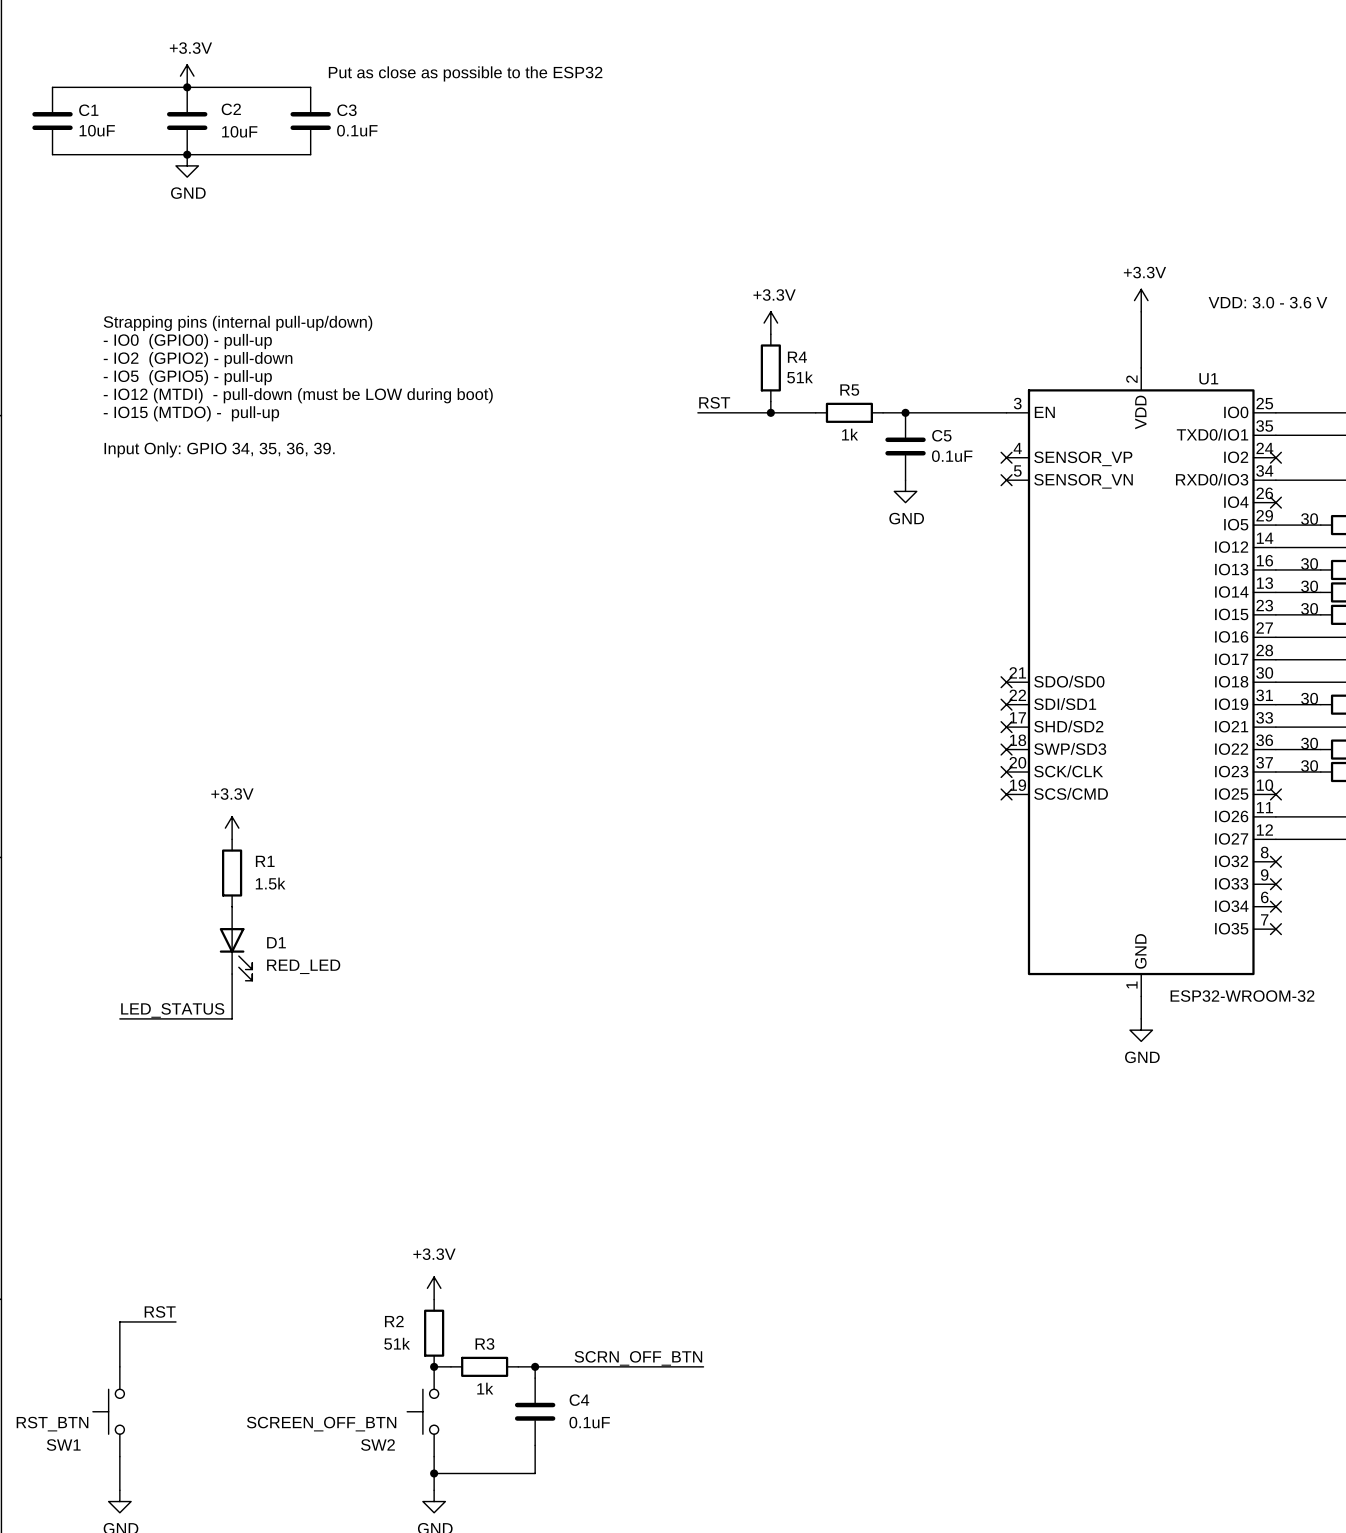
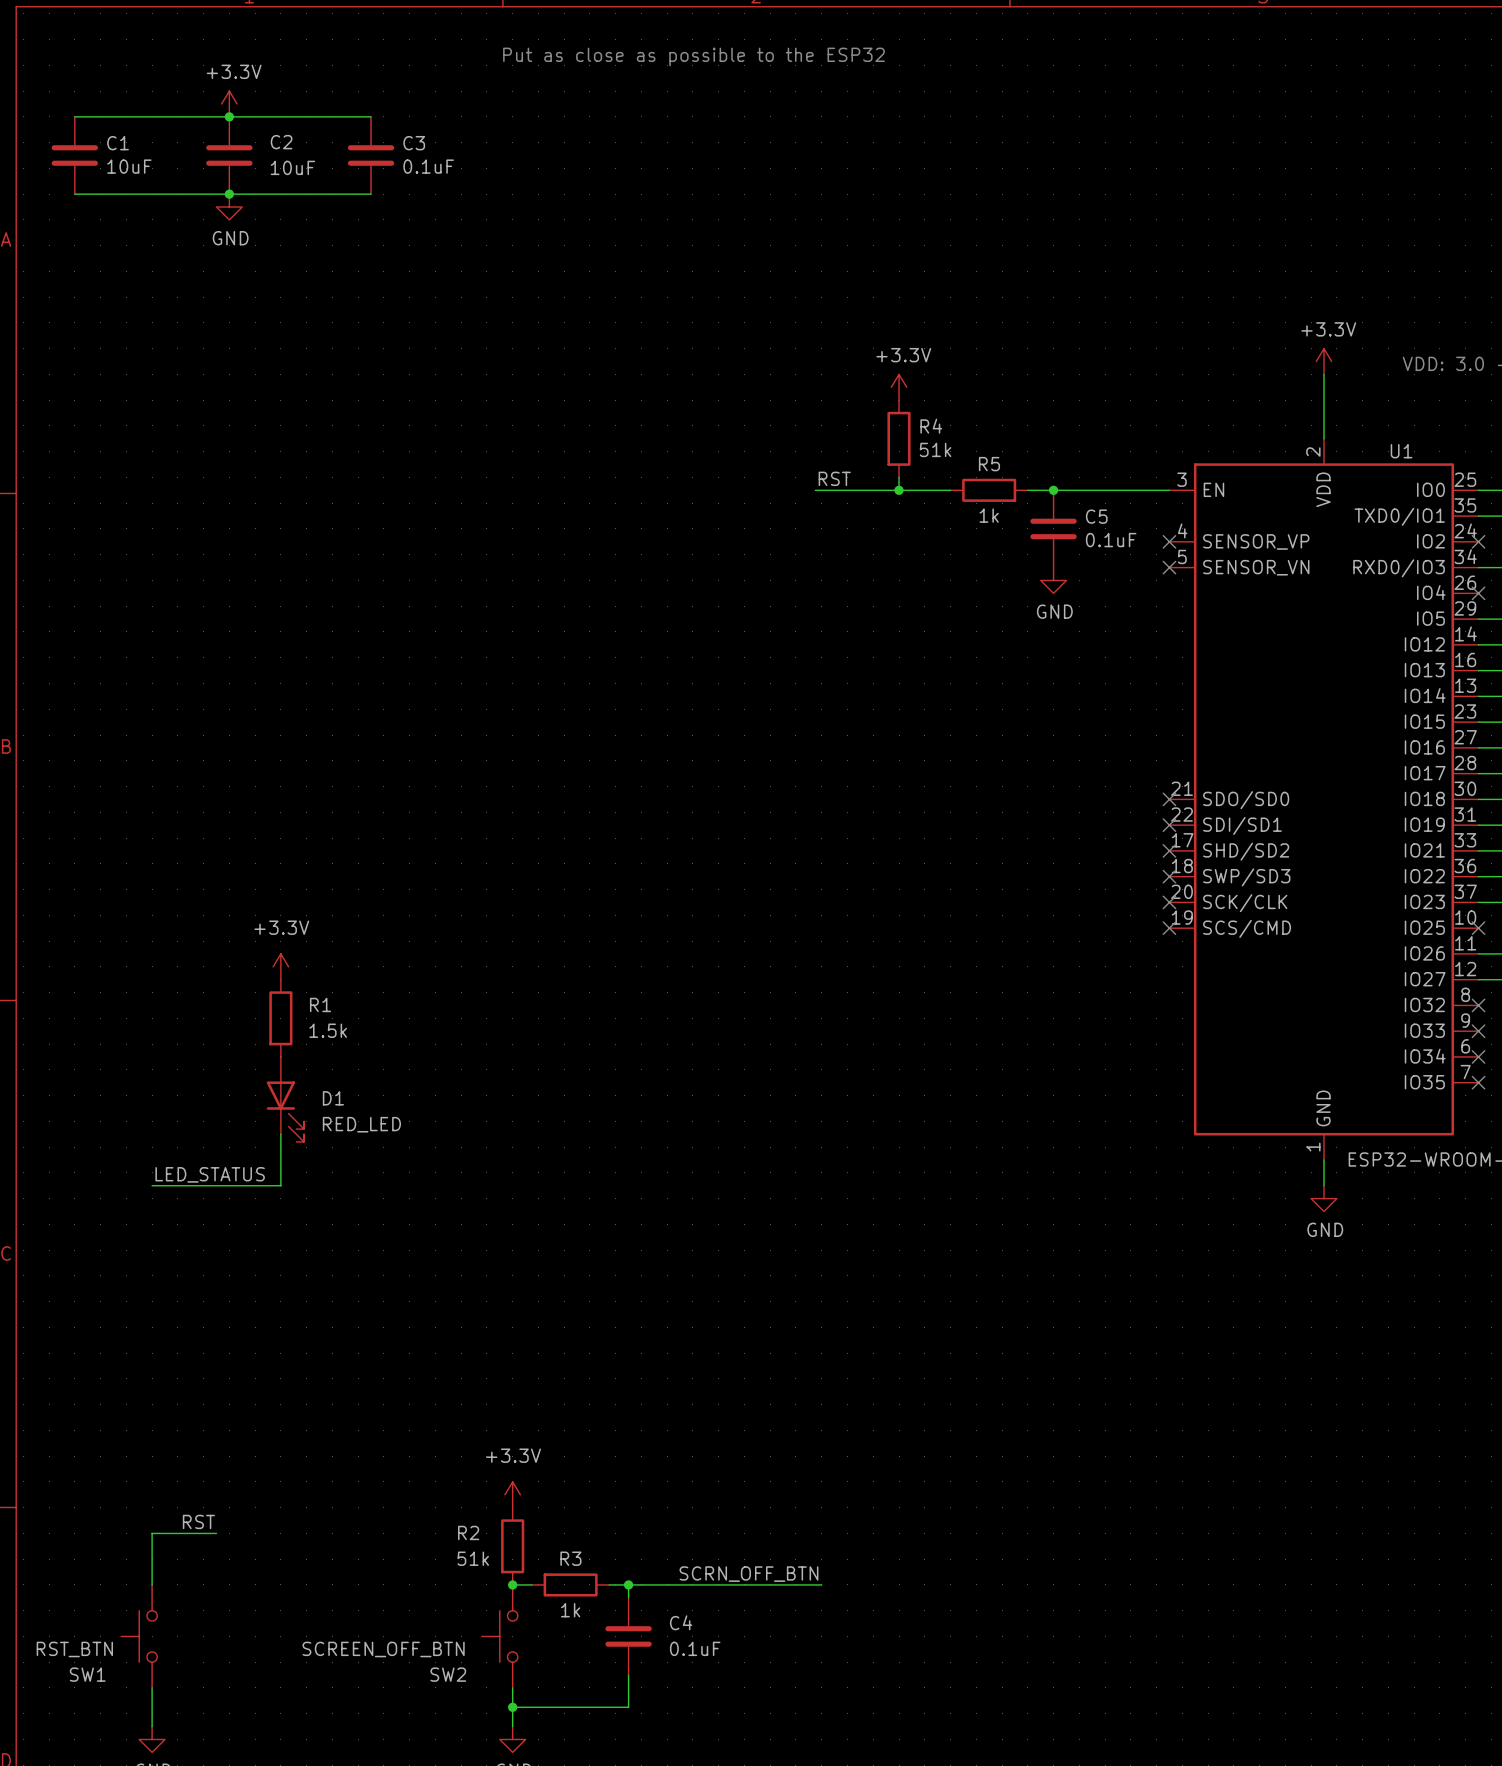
text position: Put as close as possible to the ESP32 (465, 73) -> Put as close as possible to the ESP32 (693, 56)
text: Strapping pins (internal pull-up/down) (238, 323) -> none
text: - IO0 (GPIO0) - pull-up (187, 341) -> none
text: - IO2 (GPIO2) - pull-down (198, 359) -> none
text: - IO5 (GPIO5) - pull-up (187, 377) -> none
text: - IO12 (MTDI) - pull-down (must be LOW during boot) (298, 395) -> none
text: - IO15 (MTDO) - pull-up (191, 413) -> none
text: Input Only: GPIO 34, 35, 36, 39. (219, 449) -> none

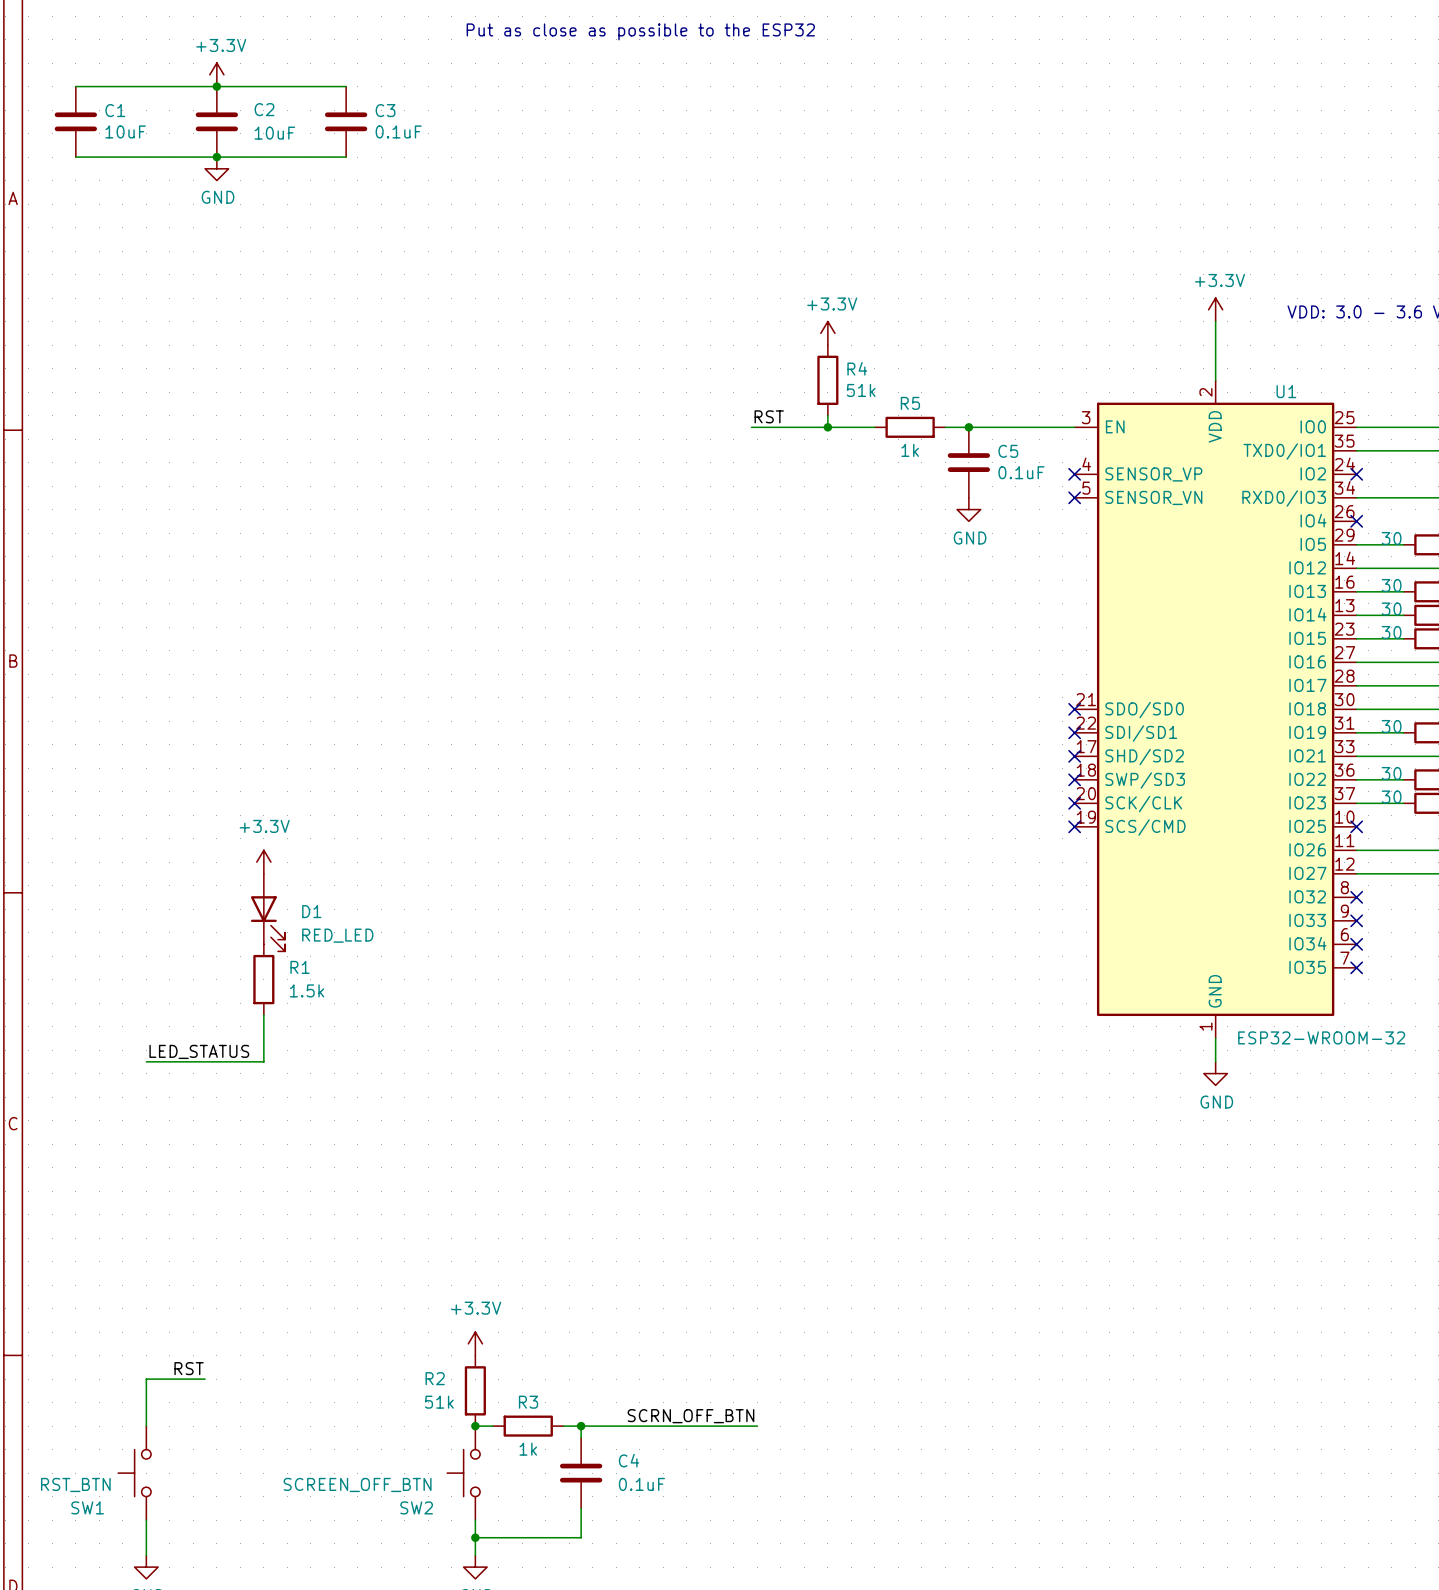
R1 position: (280, 1018) -> (263, 979)
D1 position: (285, 1099) -> (267, 912)

